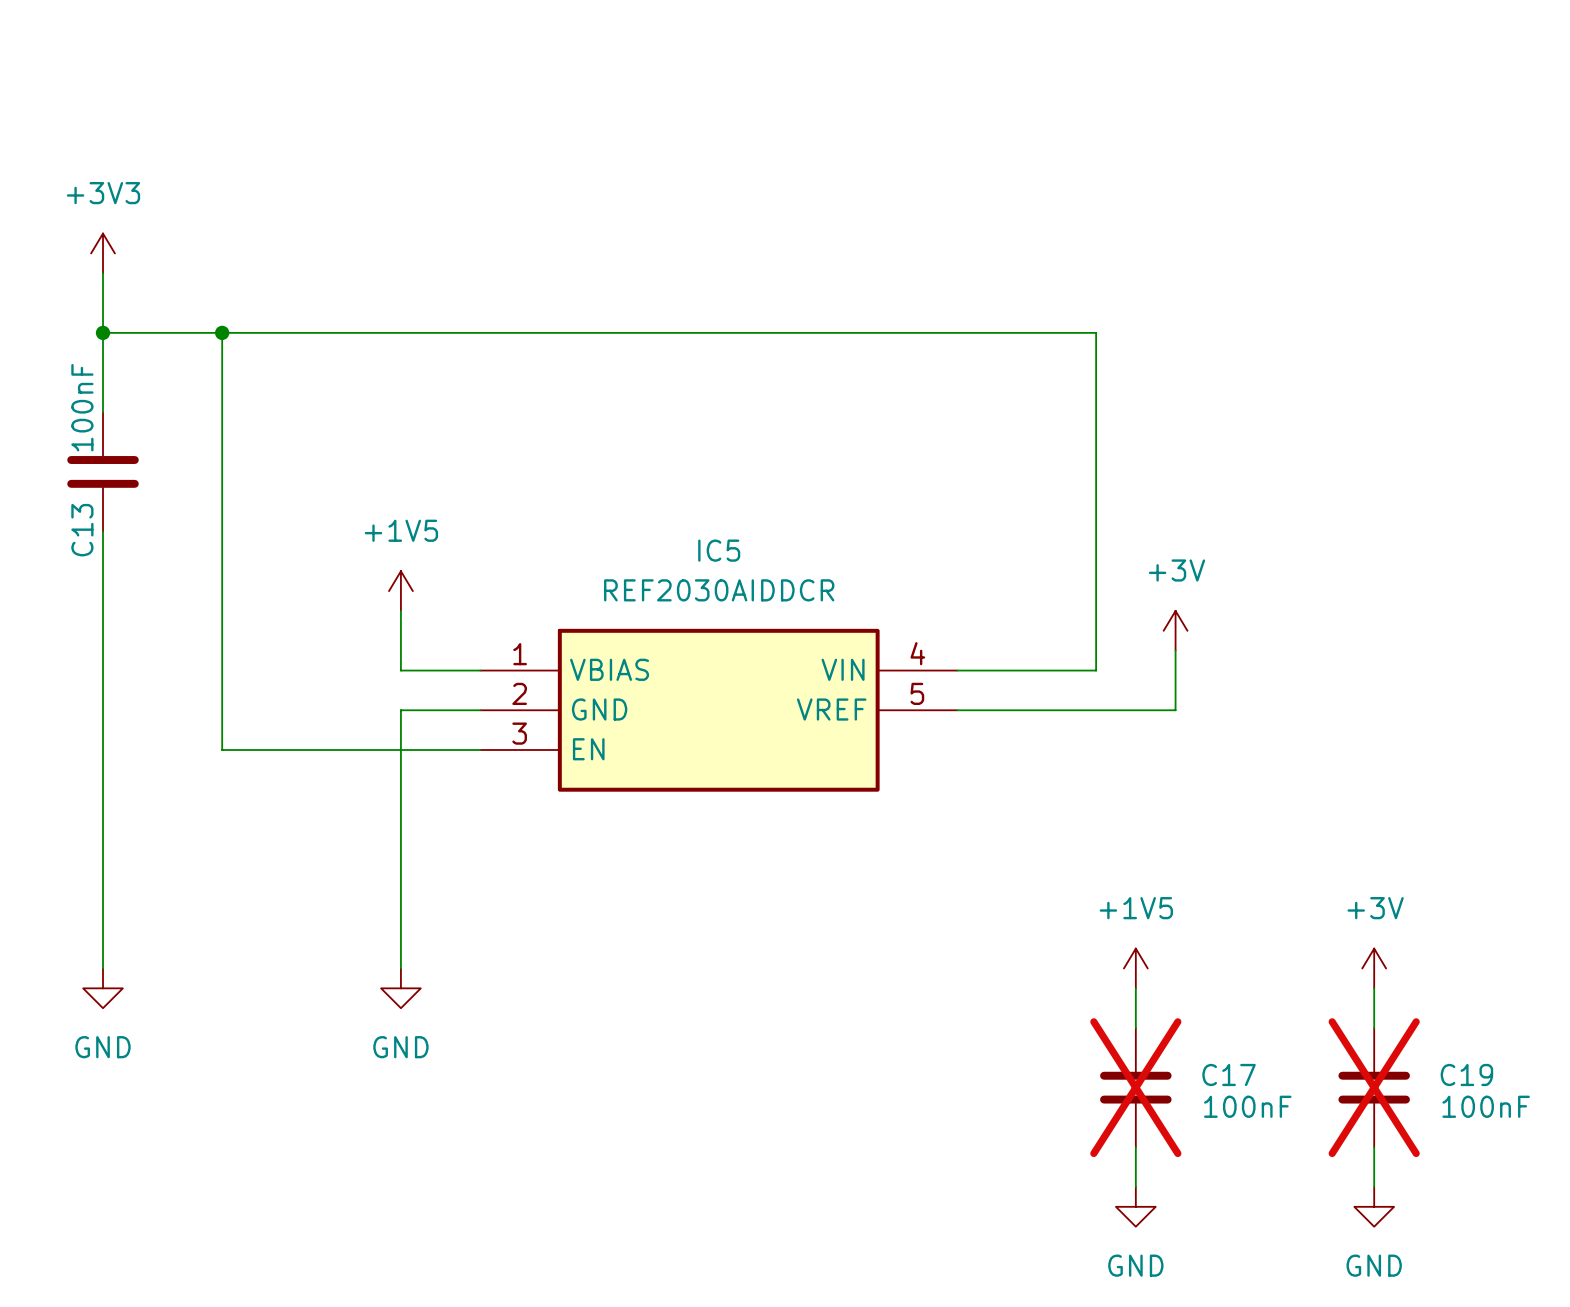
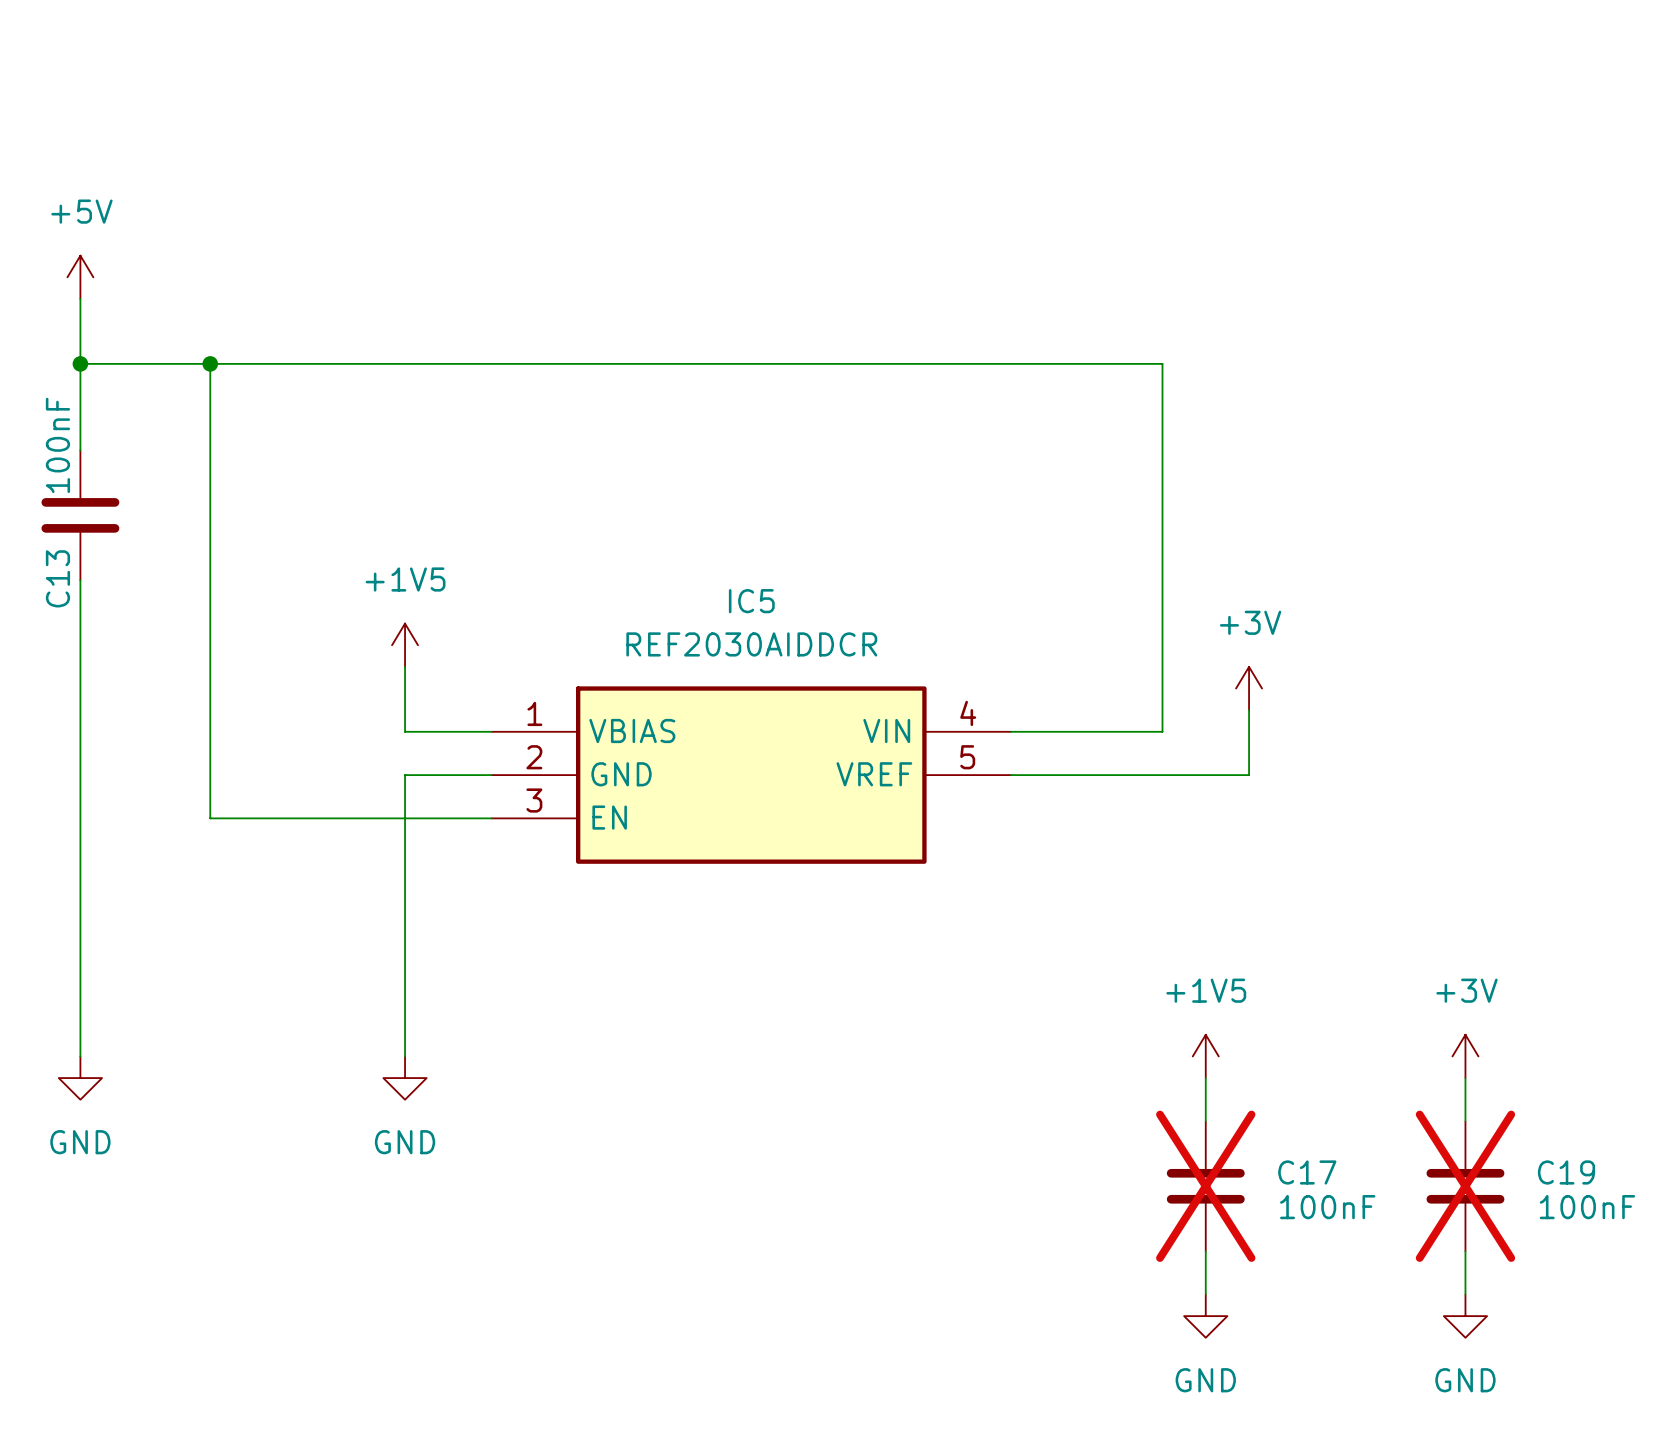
power symbol: +3V3 (103, 253) -> +5V (80, 277)

